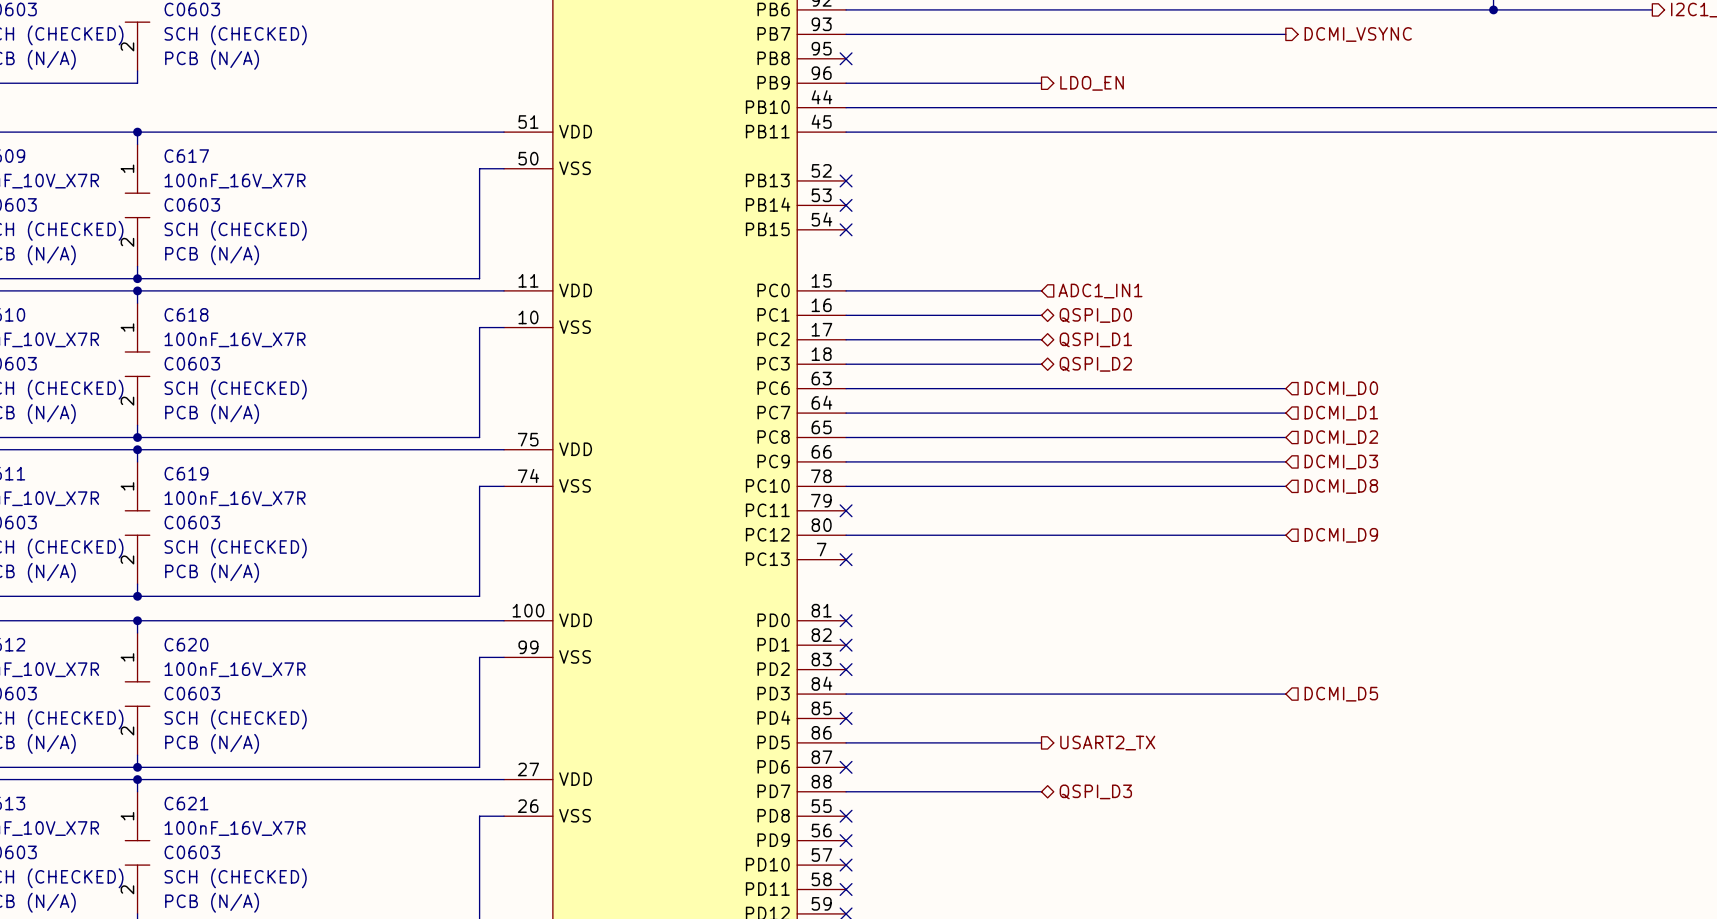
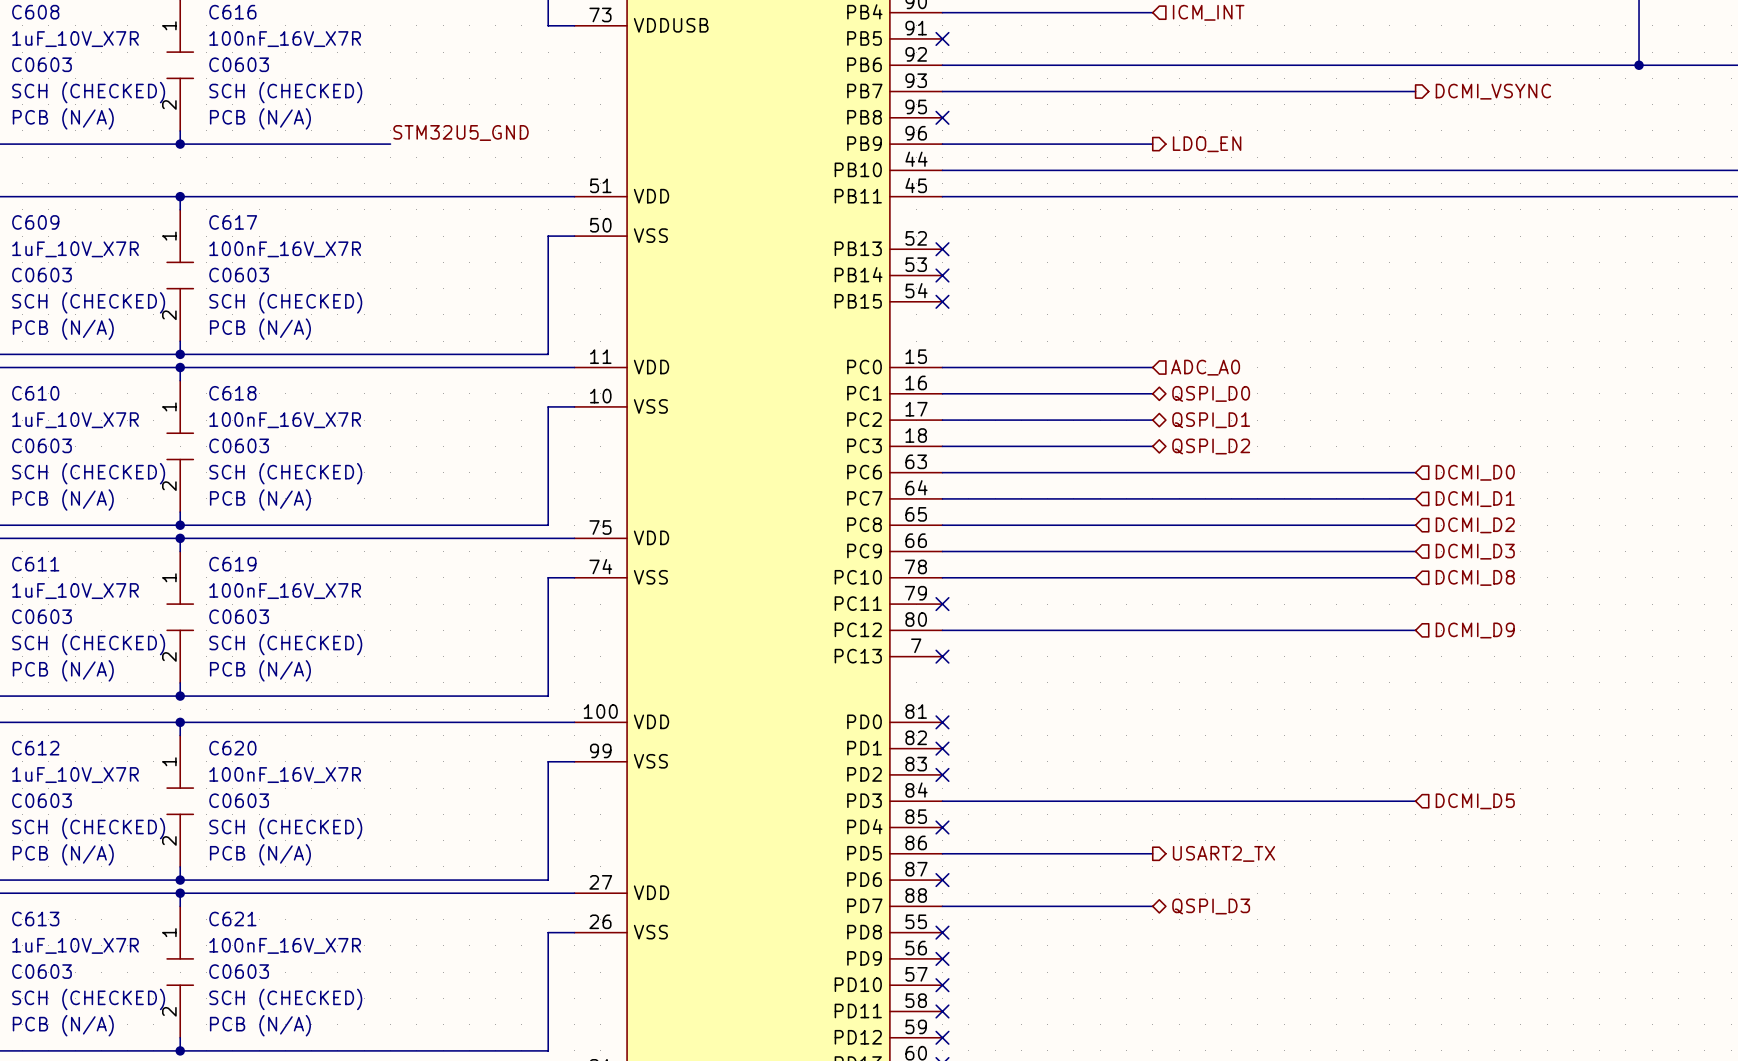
label: none -> STM32U5_GND (461, 132)
wire: none -> (180, 144) (390, 144)
junction: none -> (180, 144)
hierarchical label: ADC1_IN1 (1100, 291) -> ADC_A0 (1205, 367)

